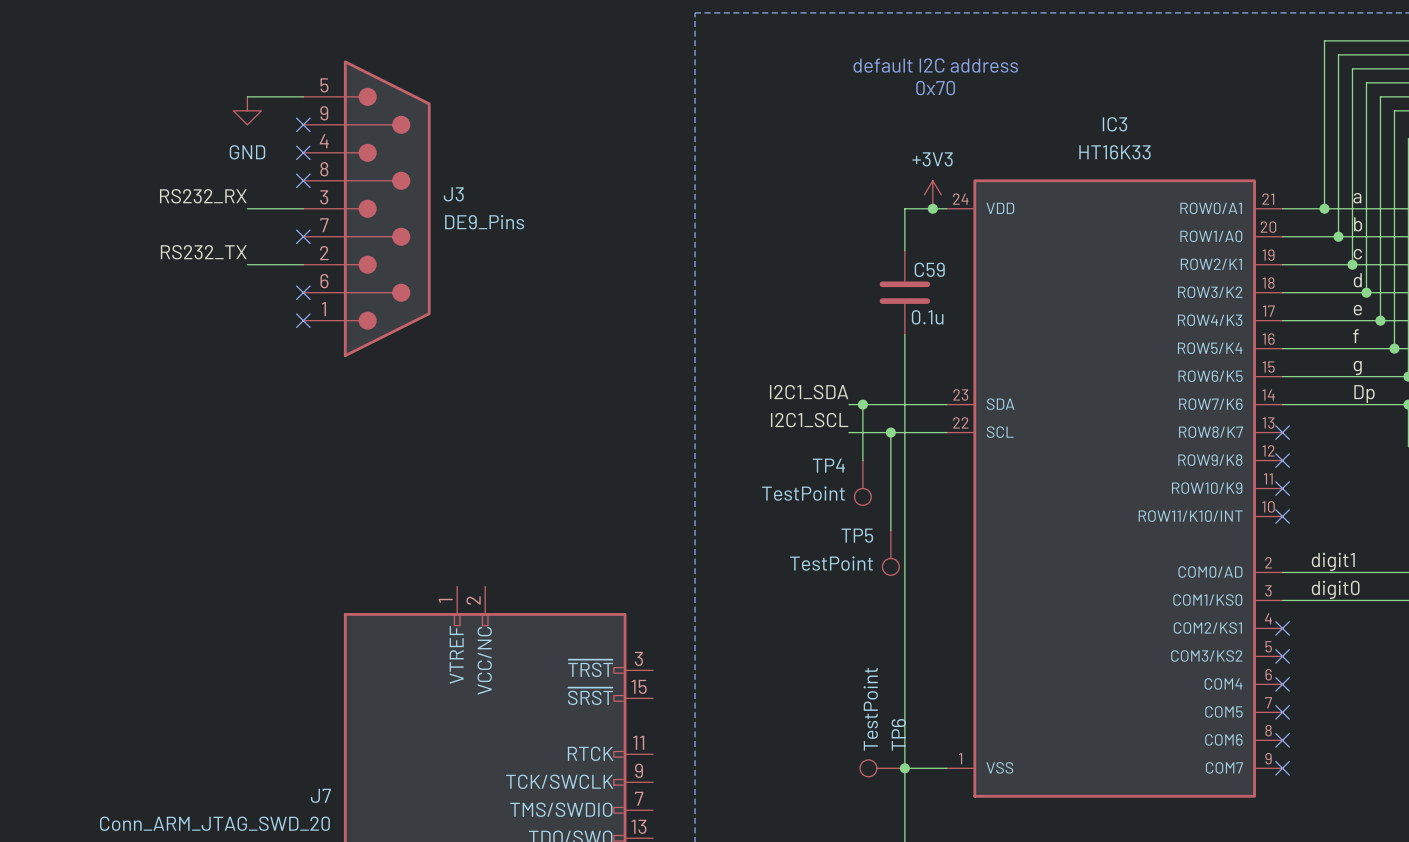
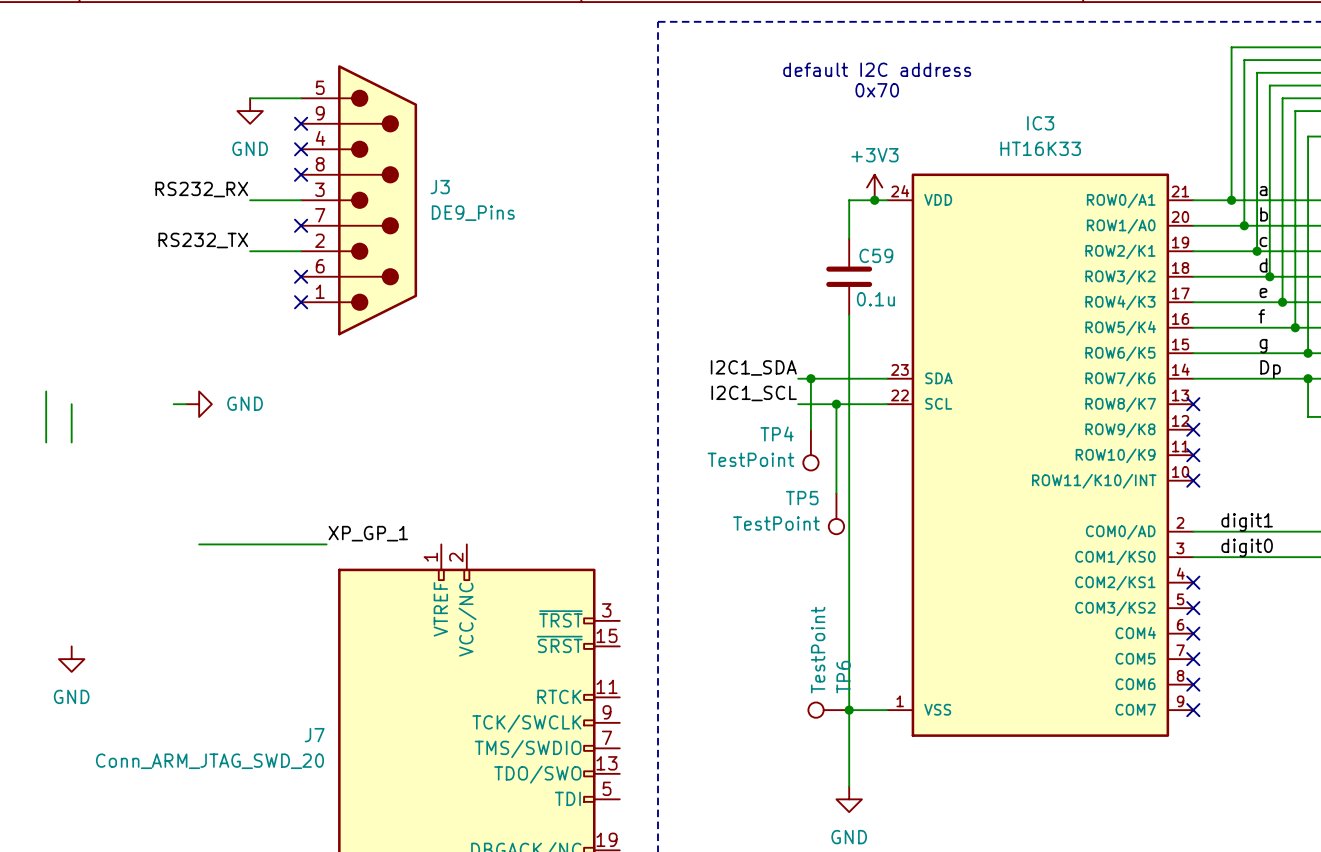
wire: none -> (46, 391) (46, 442)
wire: none -> (71, 404) (71, 442)
wire: none -> (173, 404) (186, 404)
power symbol: none -> GND (199, 404)
label: none -> XP_GP_1 (368, 533)
wire: none -> (199, 544) (326, 544)
power symbol: none -> GND (71, 659)

